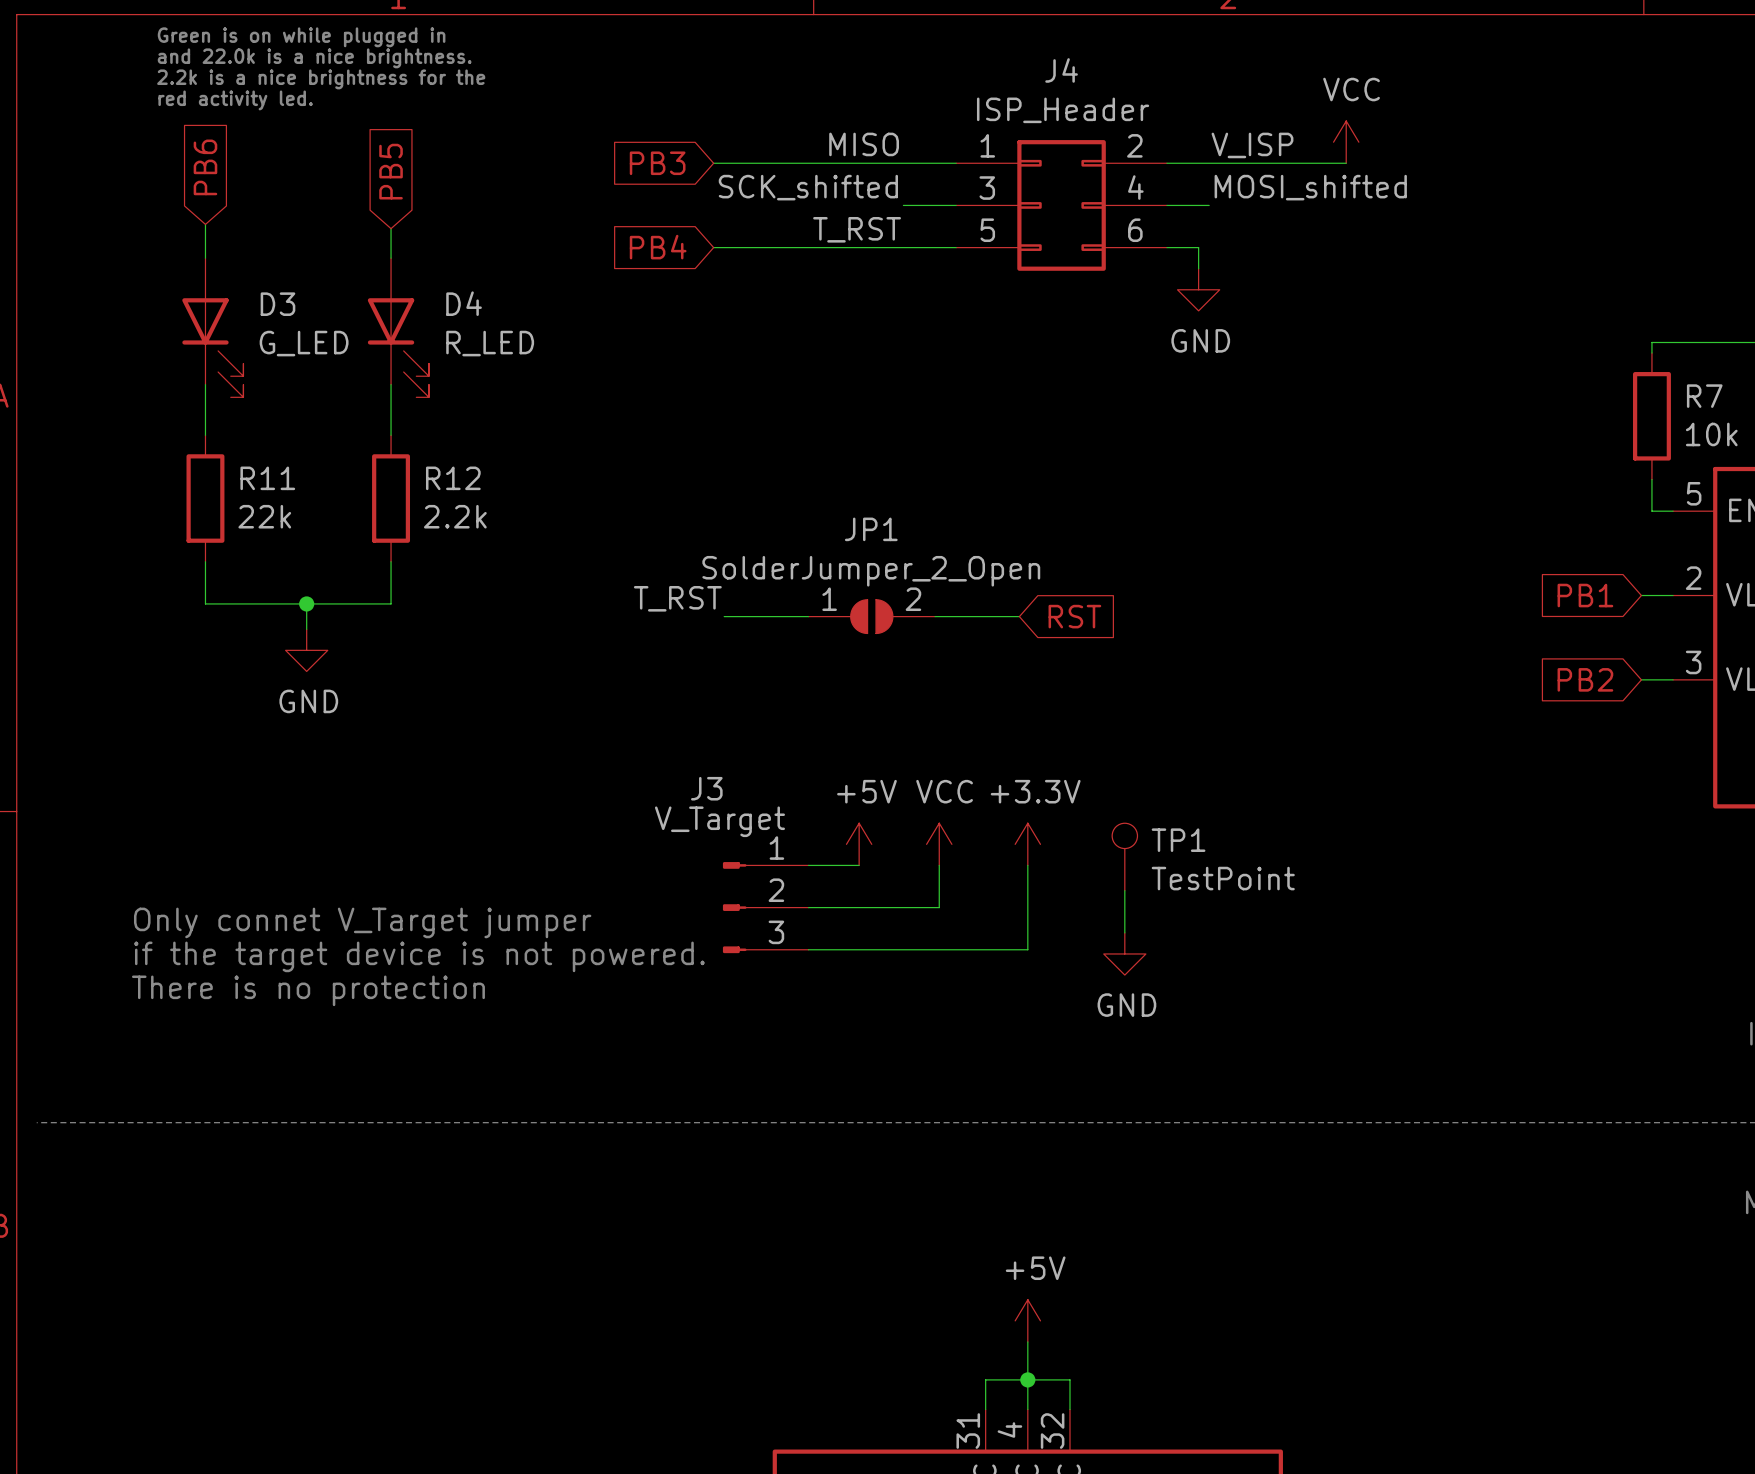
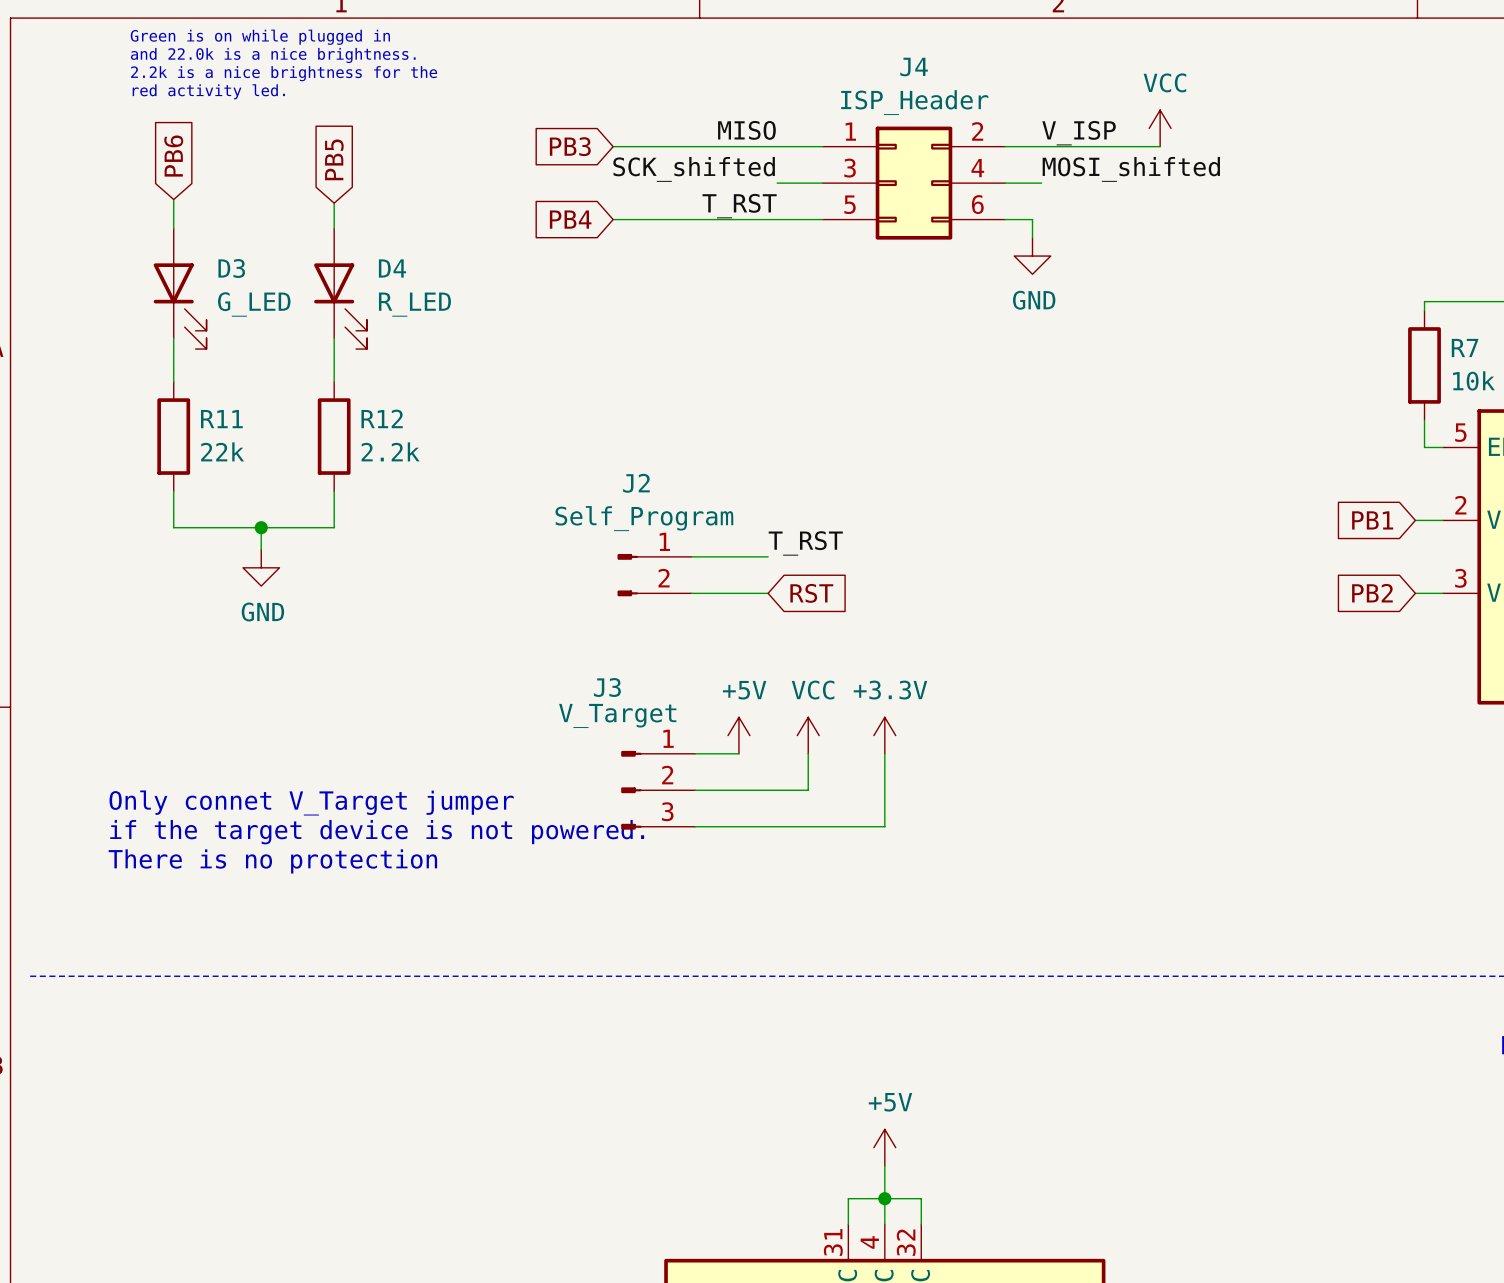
label position: T_RST (677, 598) -> T_RST (805, 543)
wire: (724, 616) (808, 616) -> none
JP1: SolderJumper_2_Open (871, 616) -> none
wire: (935, 616) (1019, 616) -> none
global label position: RST (1074, 616) -> RST (811, 593)
wire: none -> (691, 556) (768, 556)
J2: none -> Self_Program (654, 575)
wire: none -> (691, 593) (768, 593)
TP1: TestPoint (1124, 856) -> none
wire: (1124, 890) (1124, 932) -> none
power symbol: GND (1124, 953) -> none

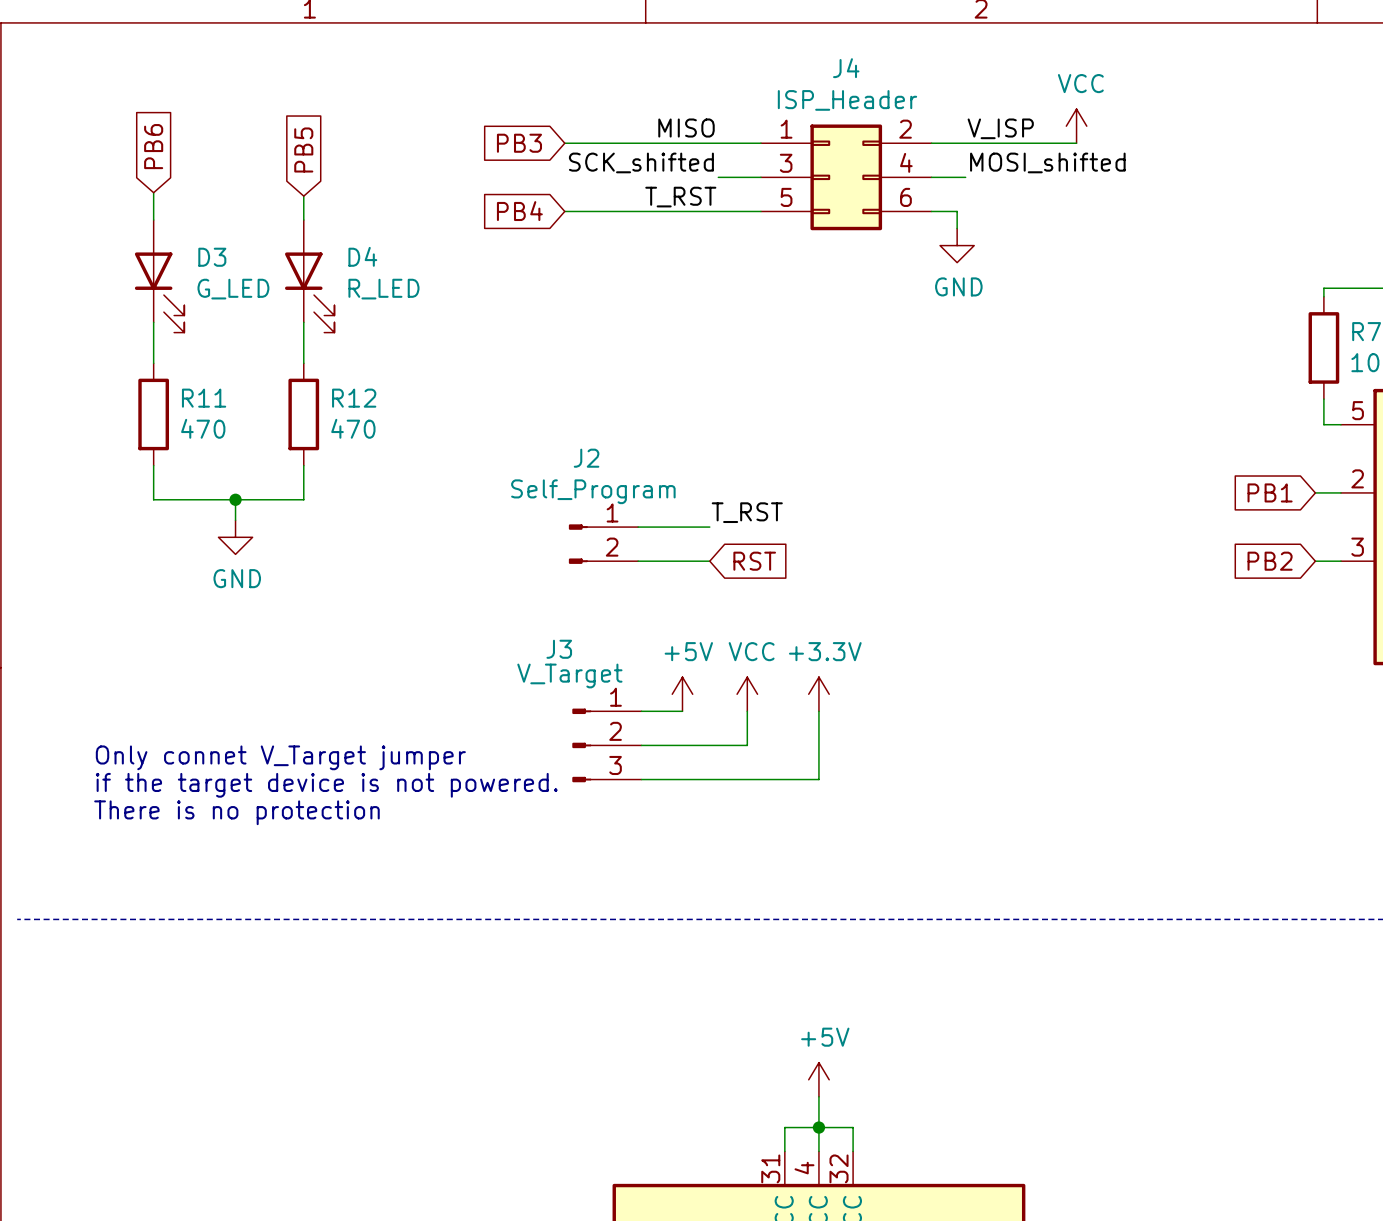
text: Green is on while plugged in (260, 37) -> none
text: and 22.0k is a nice brightness. (273, 55) -> none
text: 2.2k is a nice brightness for the (284, 73) -> none
text: red activity led. (208, 91) -> none
R11 value: 22k (222, 451) -> 470 (203, 428)
R12 value: 2.2k (390, 451) -> 470 (353, 428)

